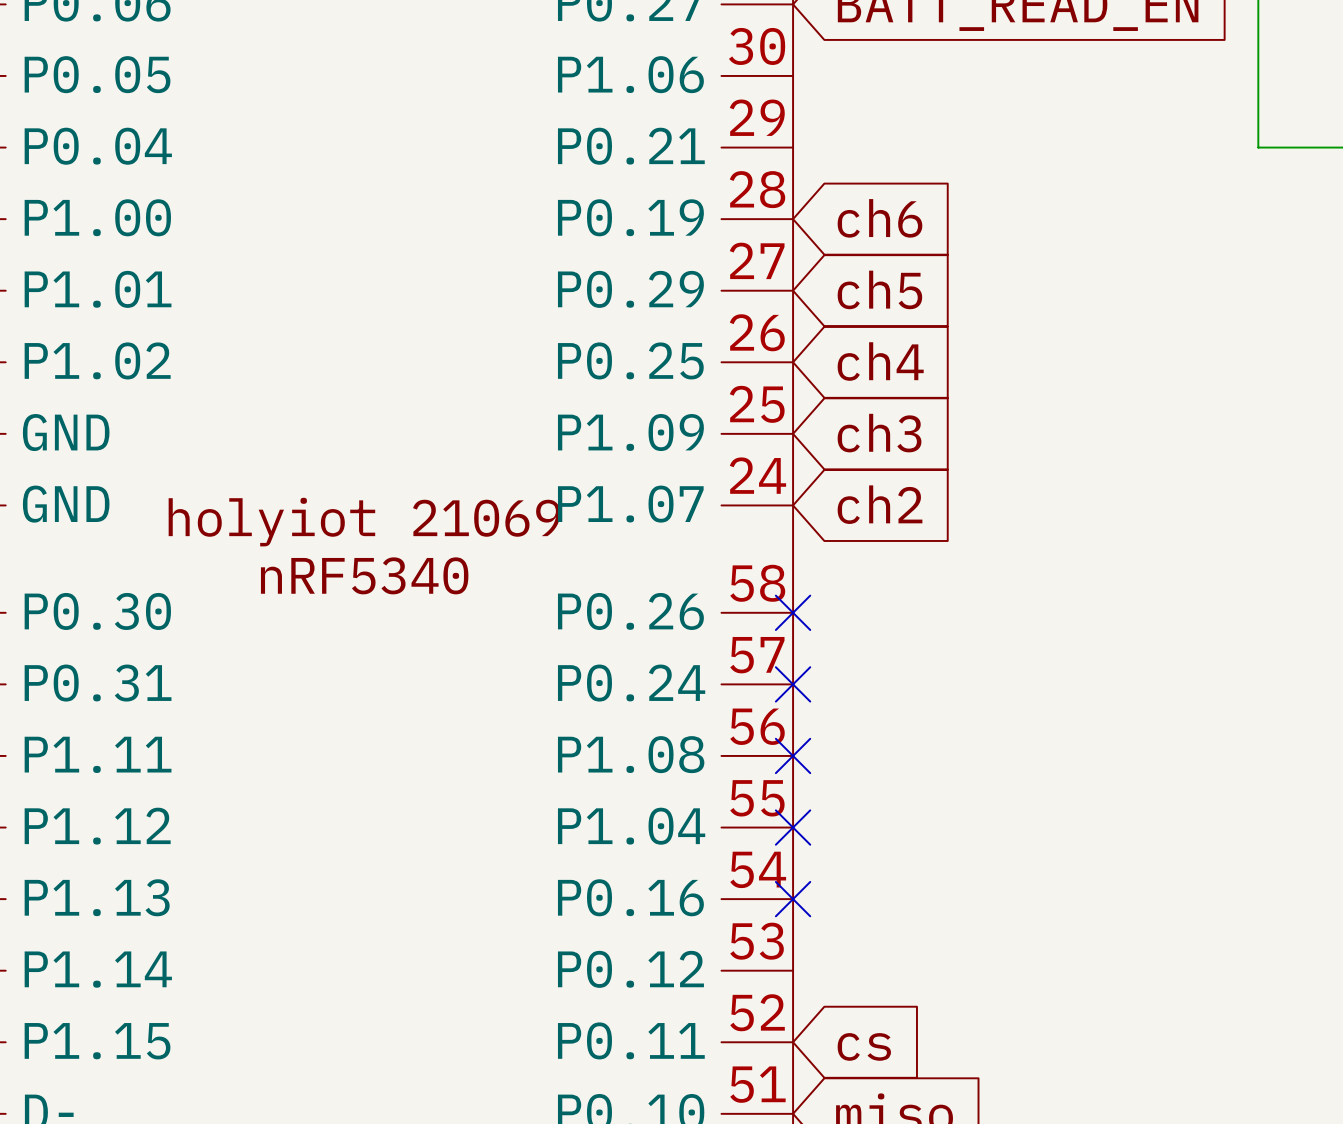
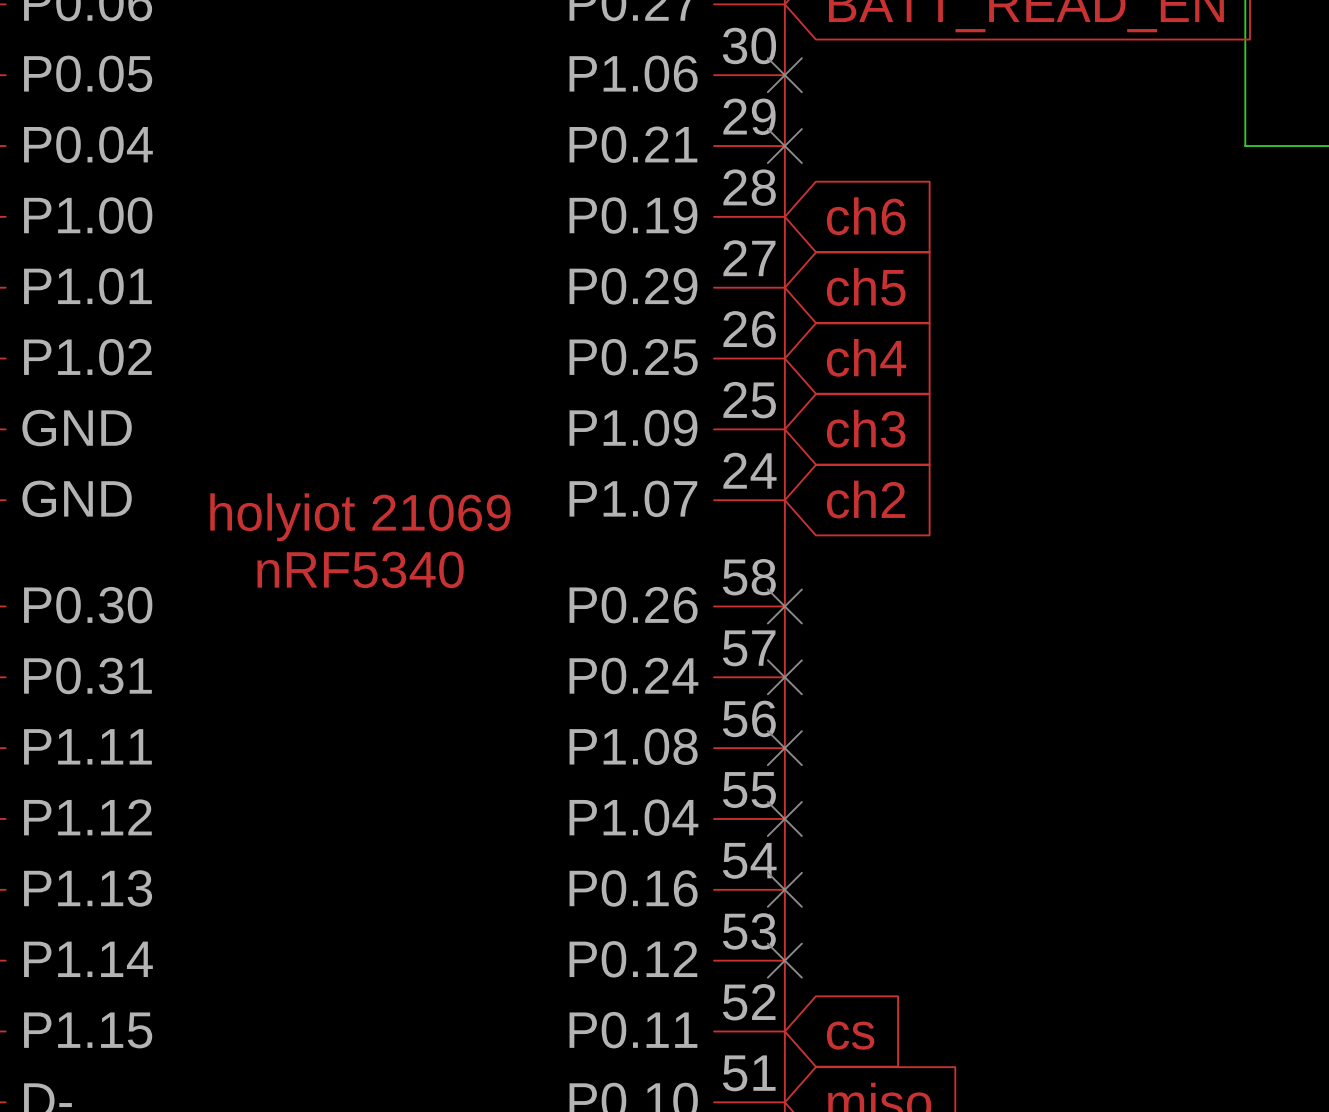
no-connect mark: none -> (784, 75)
no-connect mark: none -> (784, 146)
no-connect mark: none -> (784, 960)

